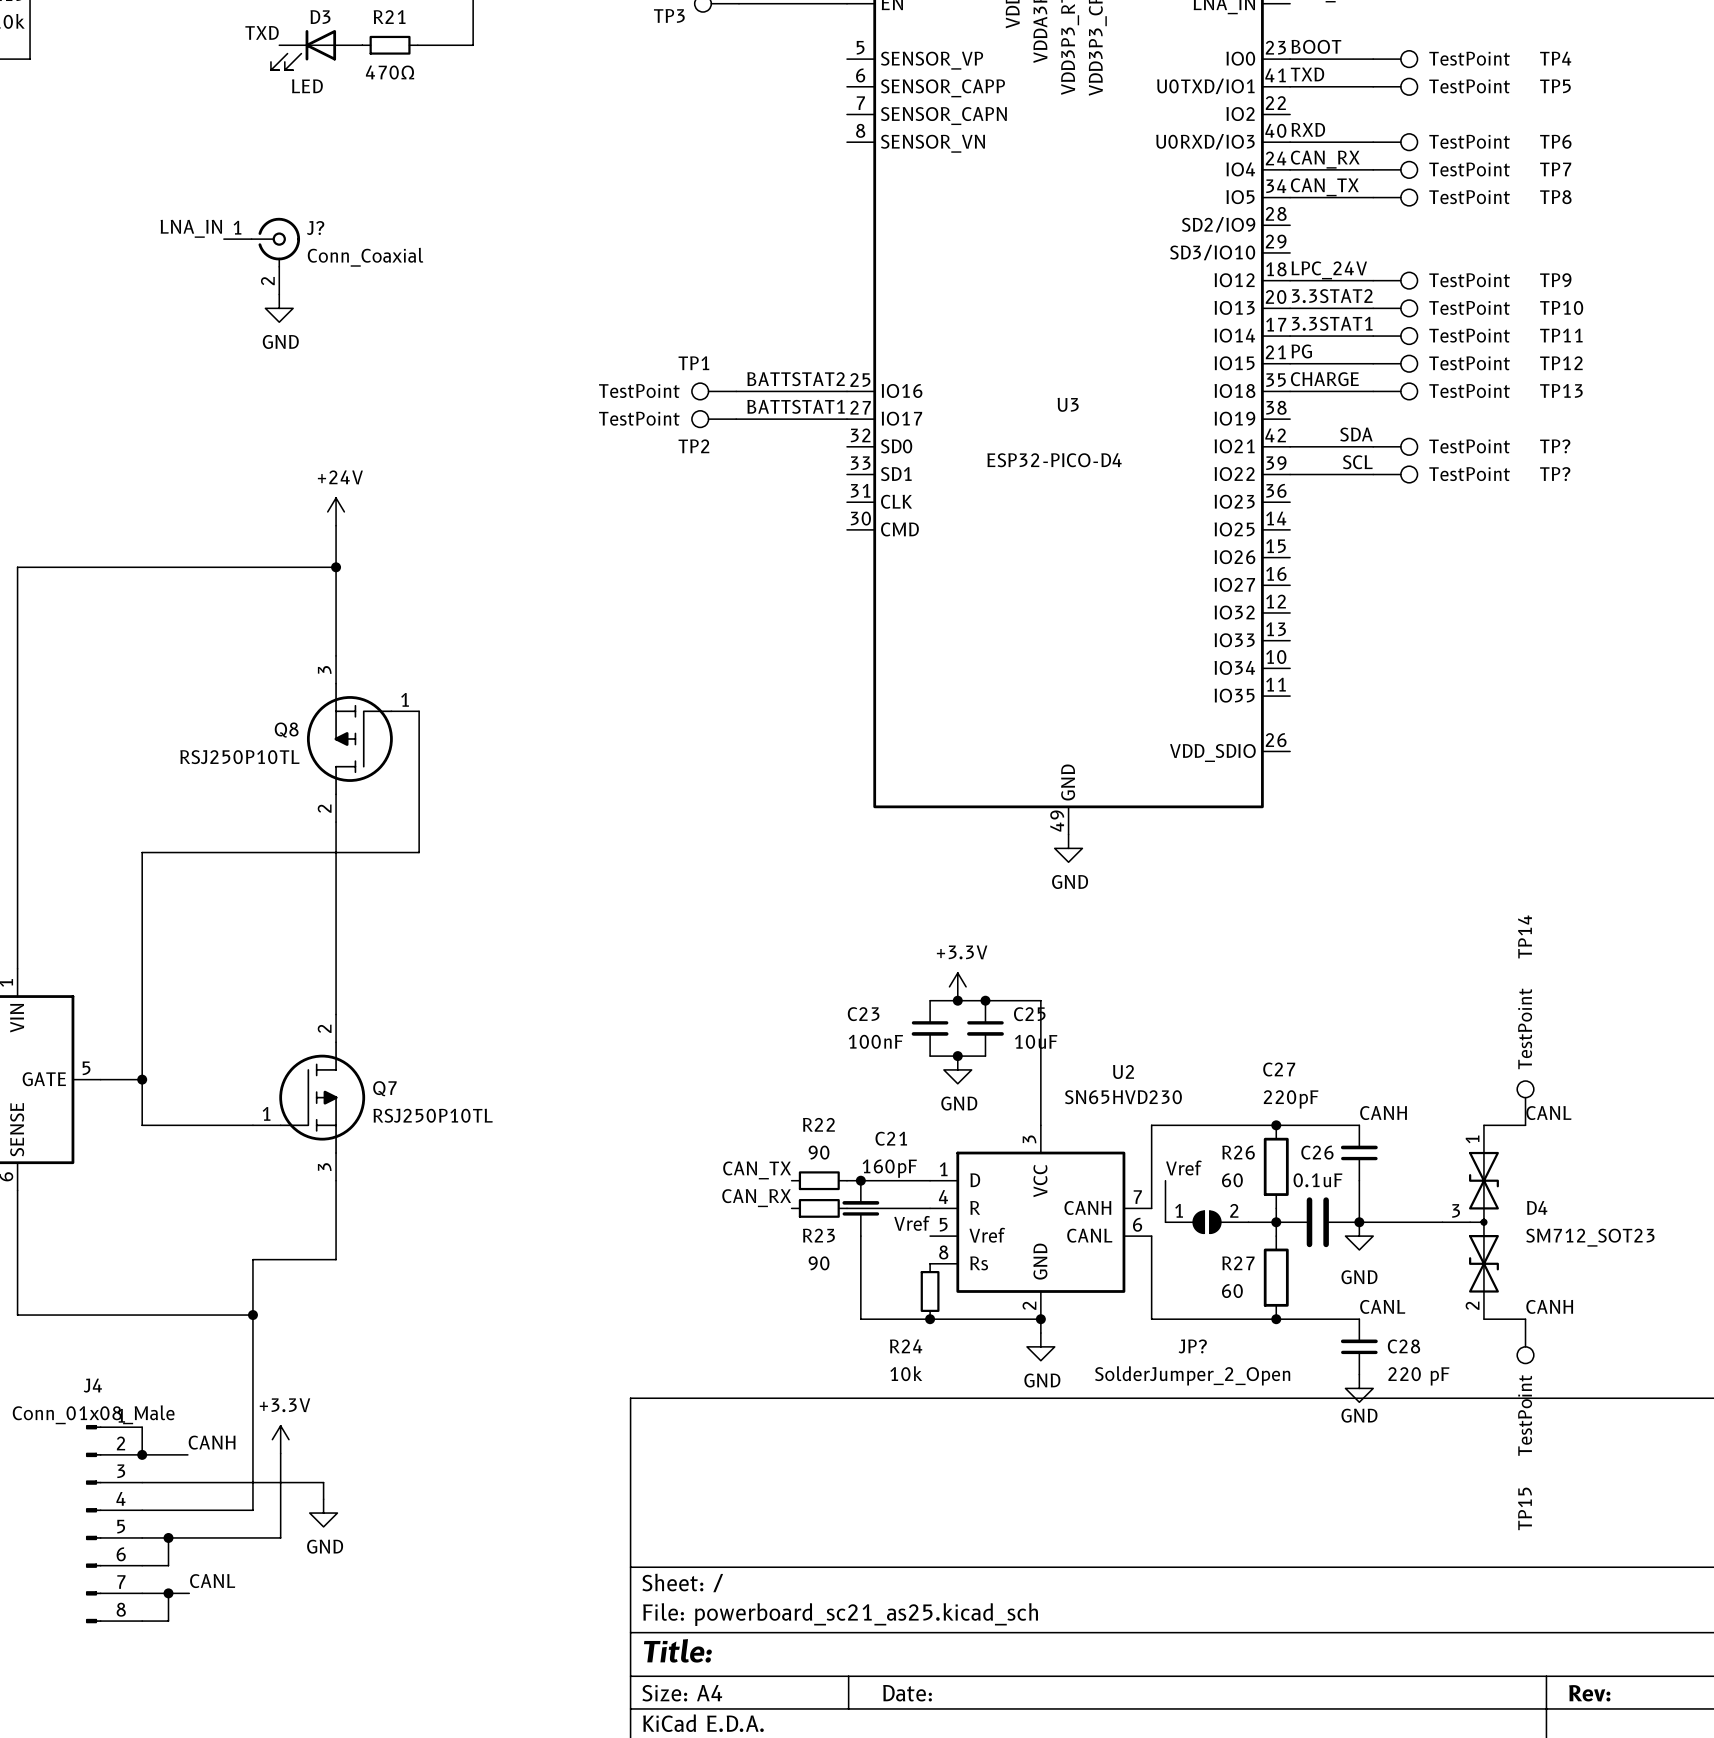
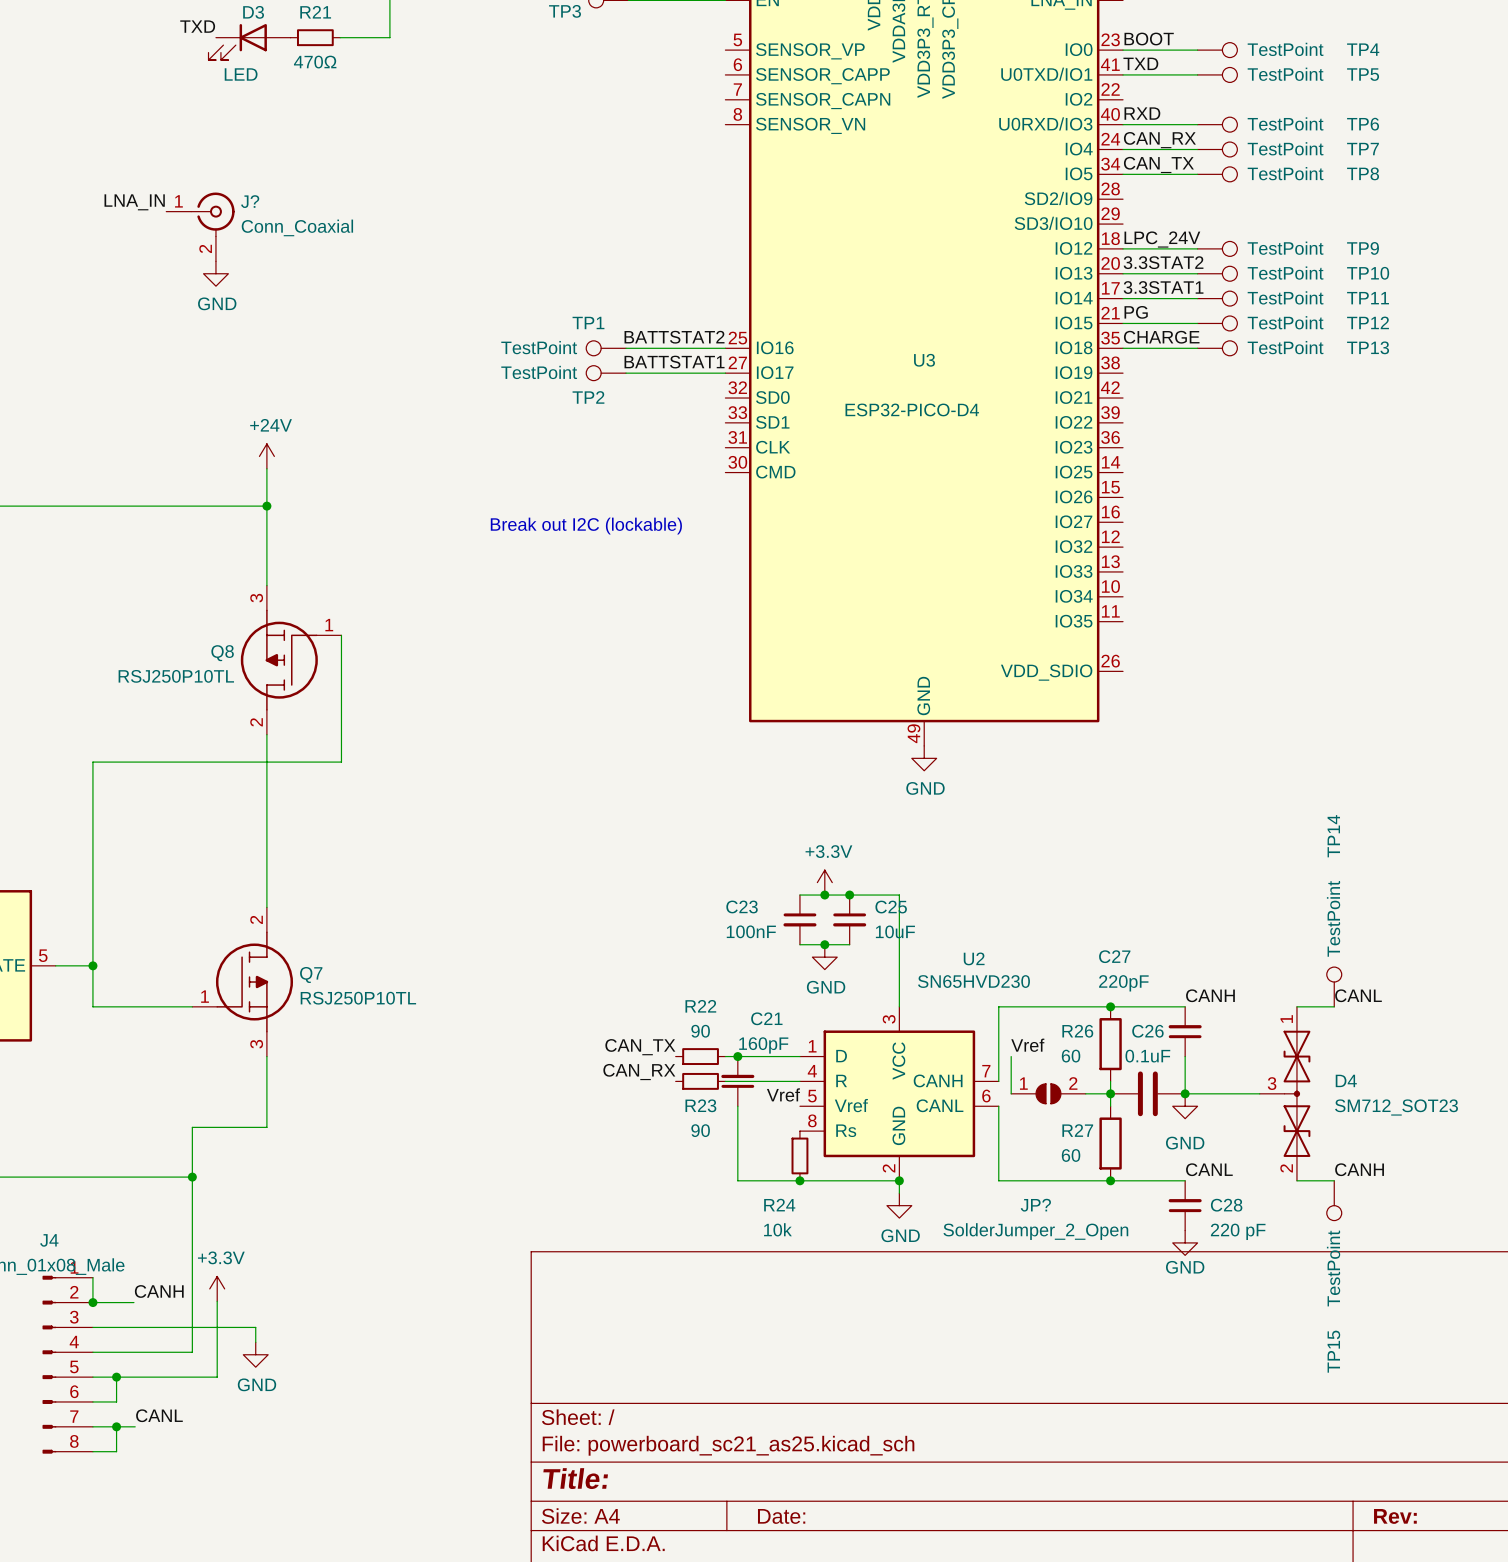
label: SDA (1356, 434) -> none
wire: (1290, 446) (1373, 446) -> none
TP?: TestPoint (1395, 446) -> none
label: SCL (1357, 462) -> none
wire: (1290, 474) (1373, 474) -> none
TP?: TestPoint (1395, 474) -> none
text: none -> Break out I2C (lockable) (586, 526)

